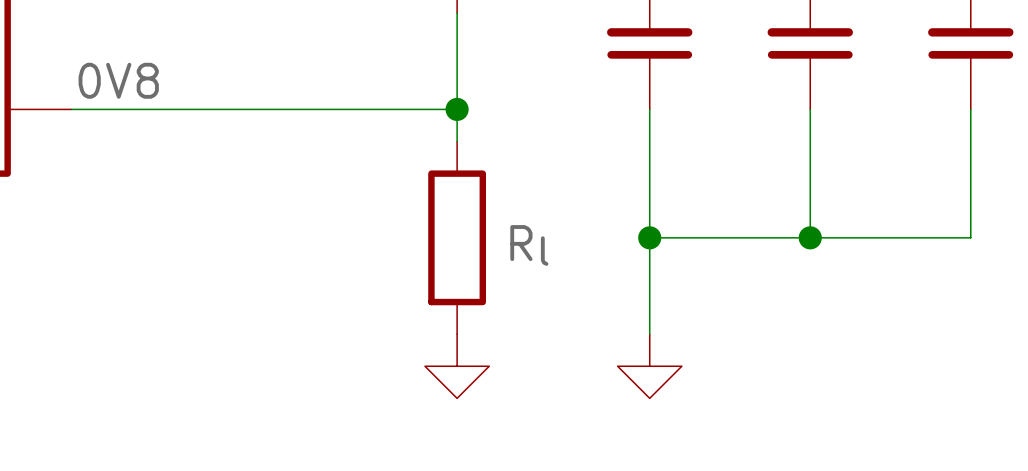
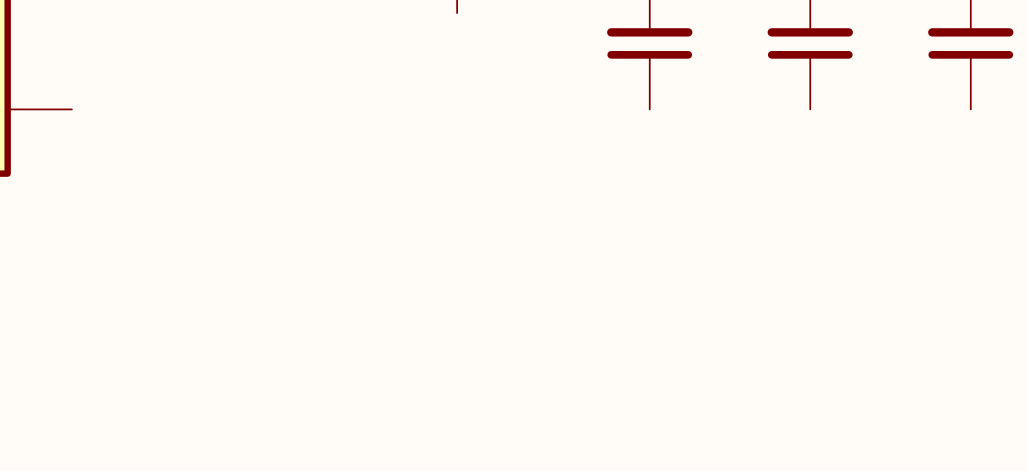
wire: (457, 13) (457, 141) -> none
label: 0V8 (118, 80) -> none
wire: (71, 109) (457, 109) -> none
junction: (457, 109) -> none
wire: (649, 109) (649, 334) -> none
wire: (810, 109) (810, 237) -> none
wire: (970, 109) (970, 237) (649, 237) -> none
Rl: (457, 237) -> none
junction: (649, 237) -> none
junction: (810, 237) -> none
power symbol: (457, 366) -> none
power symbol: (649, 366) -> none

